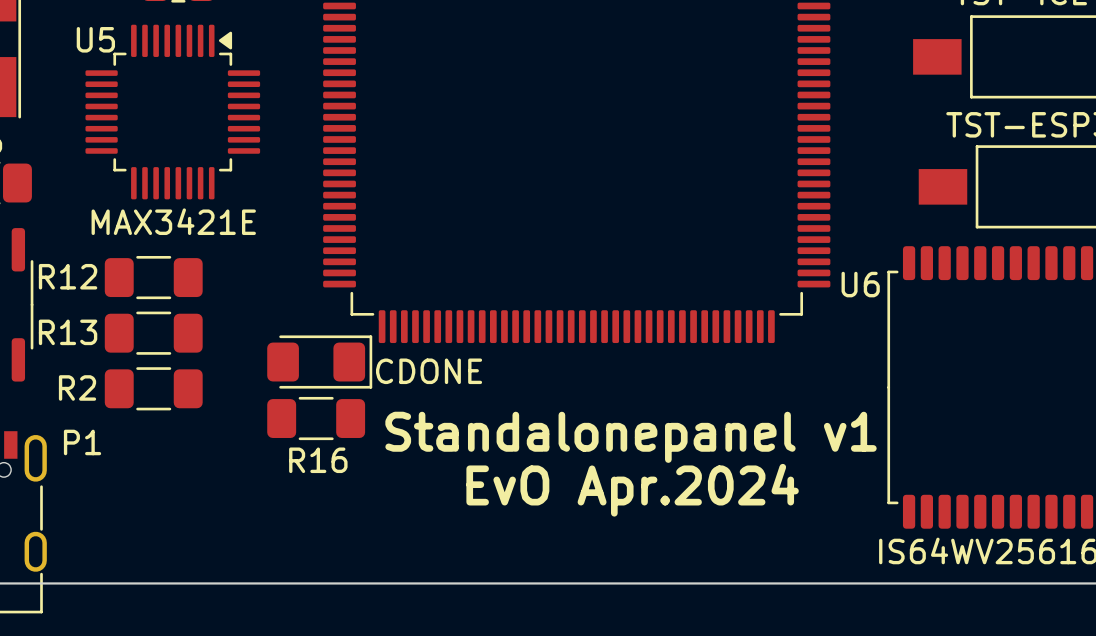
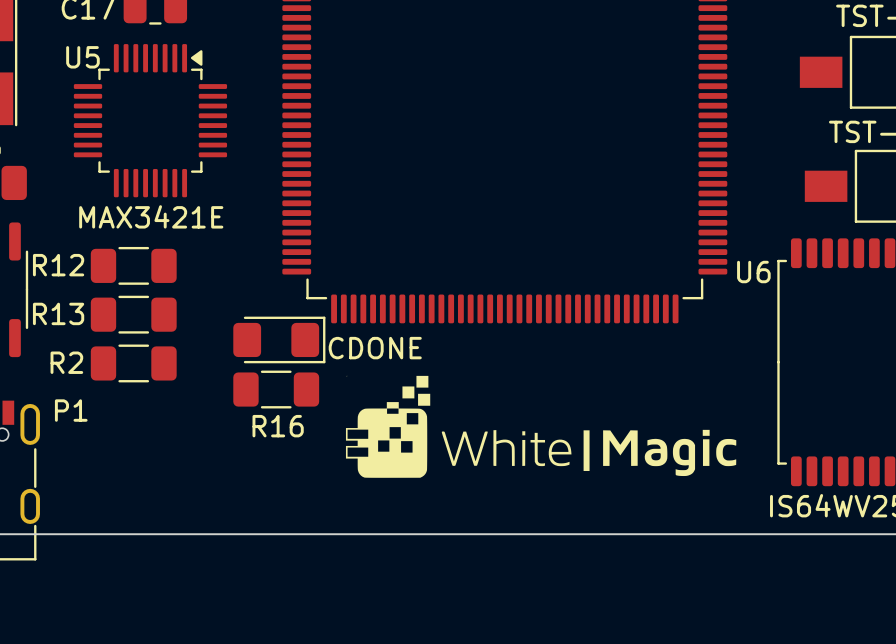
drawing: none -> [345, 375, 737, 478]
text: Standalonepanel v1 (631, 437) -> none
text: EvO Apr.2024 (632, 490) -> none

